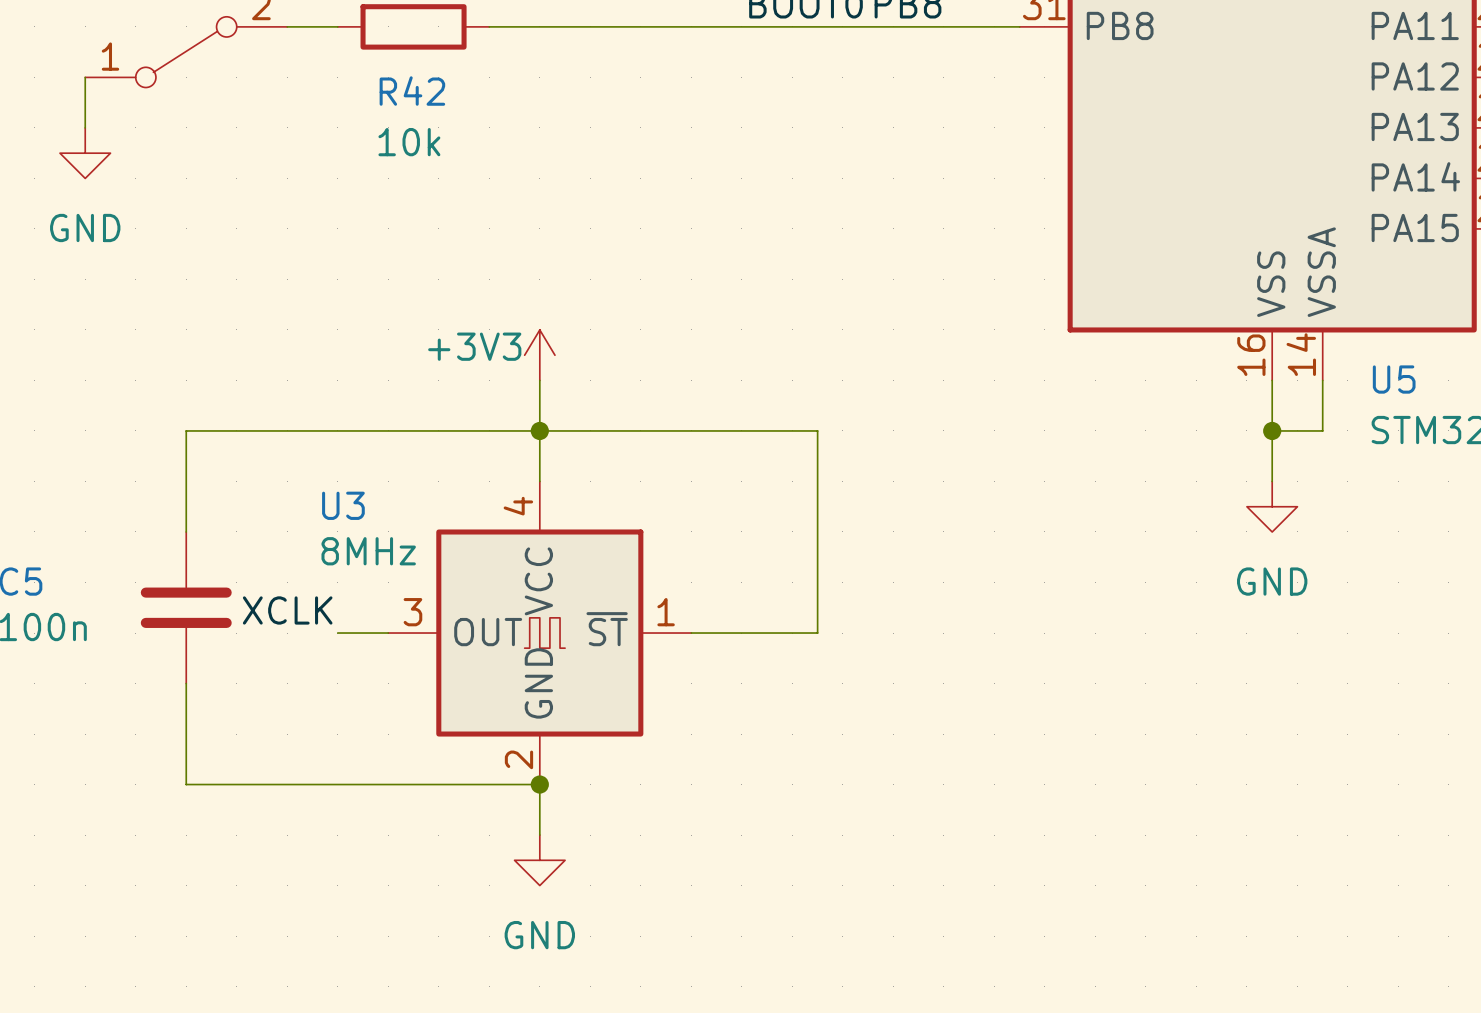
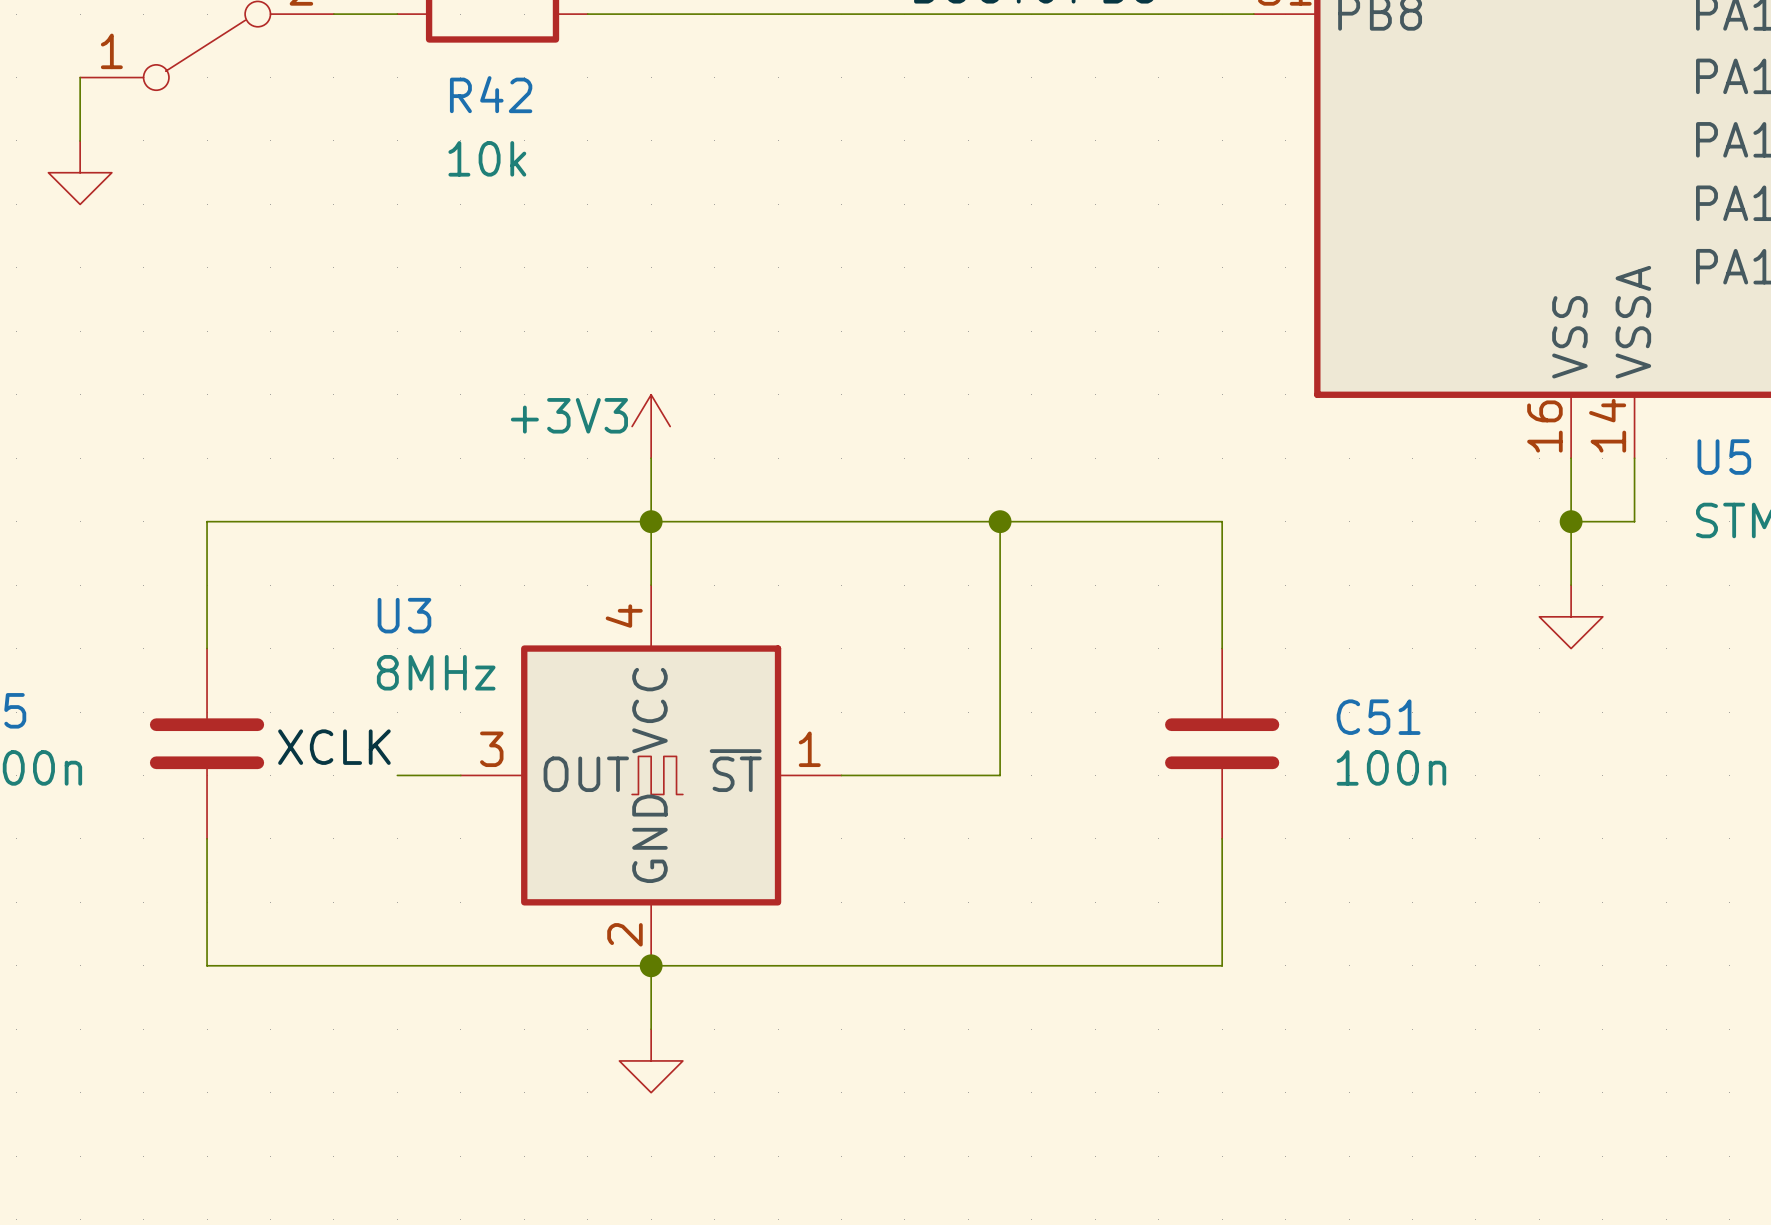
power symbol text: GND (85, 227) -> none
wire: none -> (1000, 521) (1222, 521) (1222, 648)
junction: none -> (1000, 521)
power symbol text: GND (1272, 581) -> none
C51: none -> 100n (1222, 743)
wire: none -> (1222, 838) (1222, 965) (651, 965)
power symbol text: GND (539, 935) -> none

